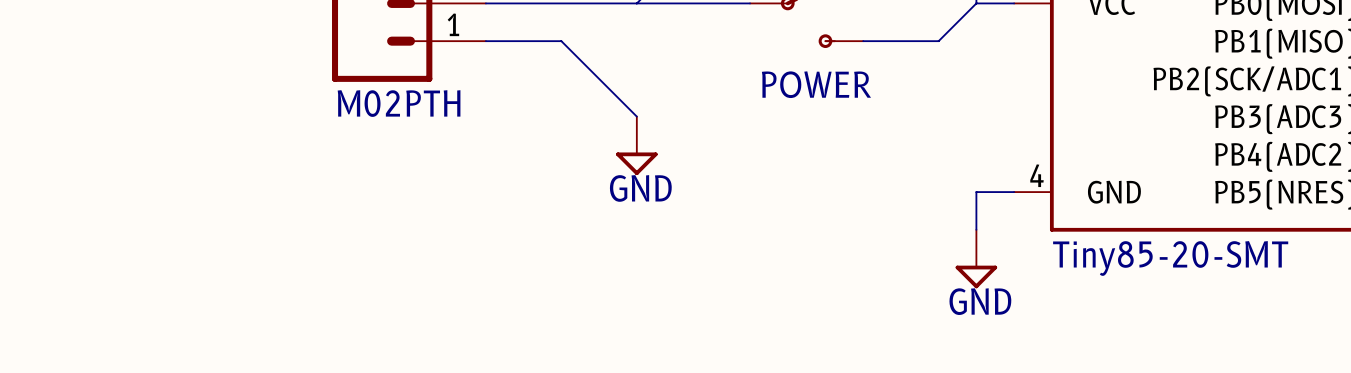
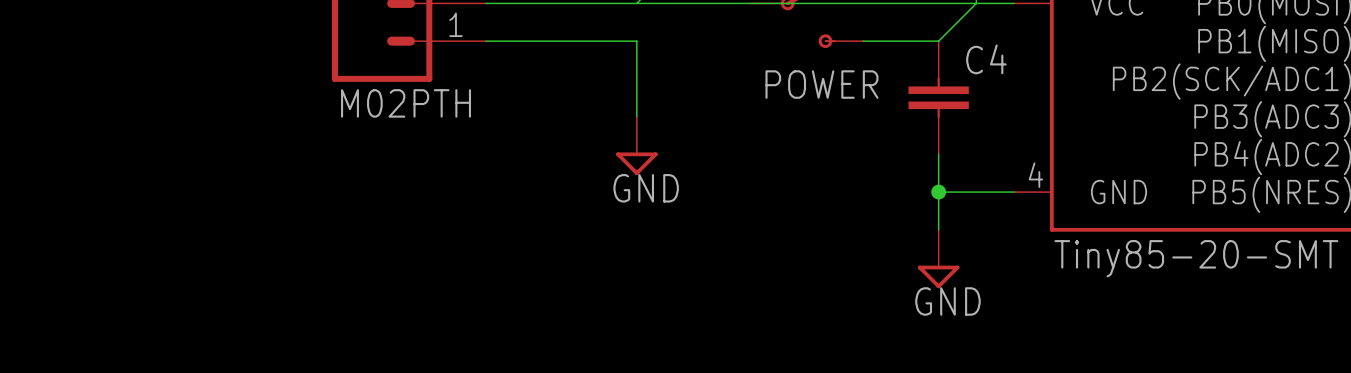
wire: none -> (750, 3) (976, 3)
wire: (561, 41) (636, 116) -> (561, 41) (636, 41) (636, 116)
C4: none -> (938, 97)
wire: none -> (938, 154) (938, 229)
junction: none -> (938, 192)
wire: (976, 192) (976, 229) -> (976, 192) (938, 192)
power symbol position: GND (976, 259) -> GND (938, 259)

